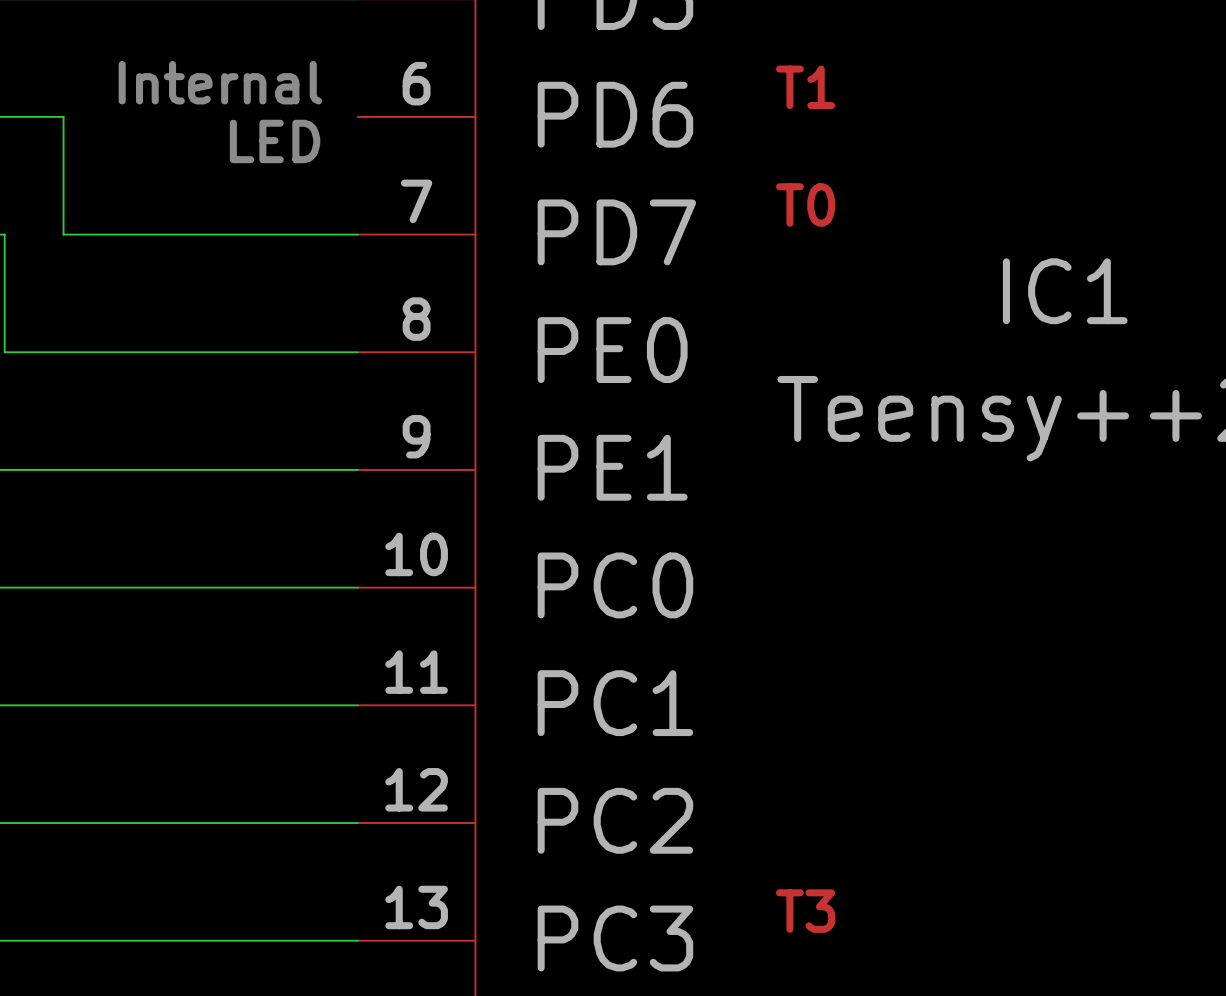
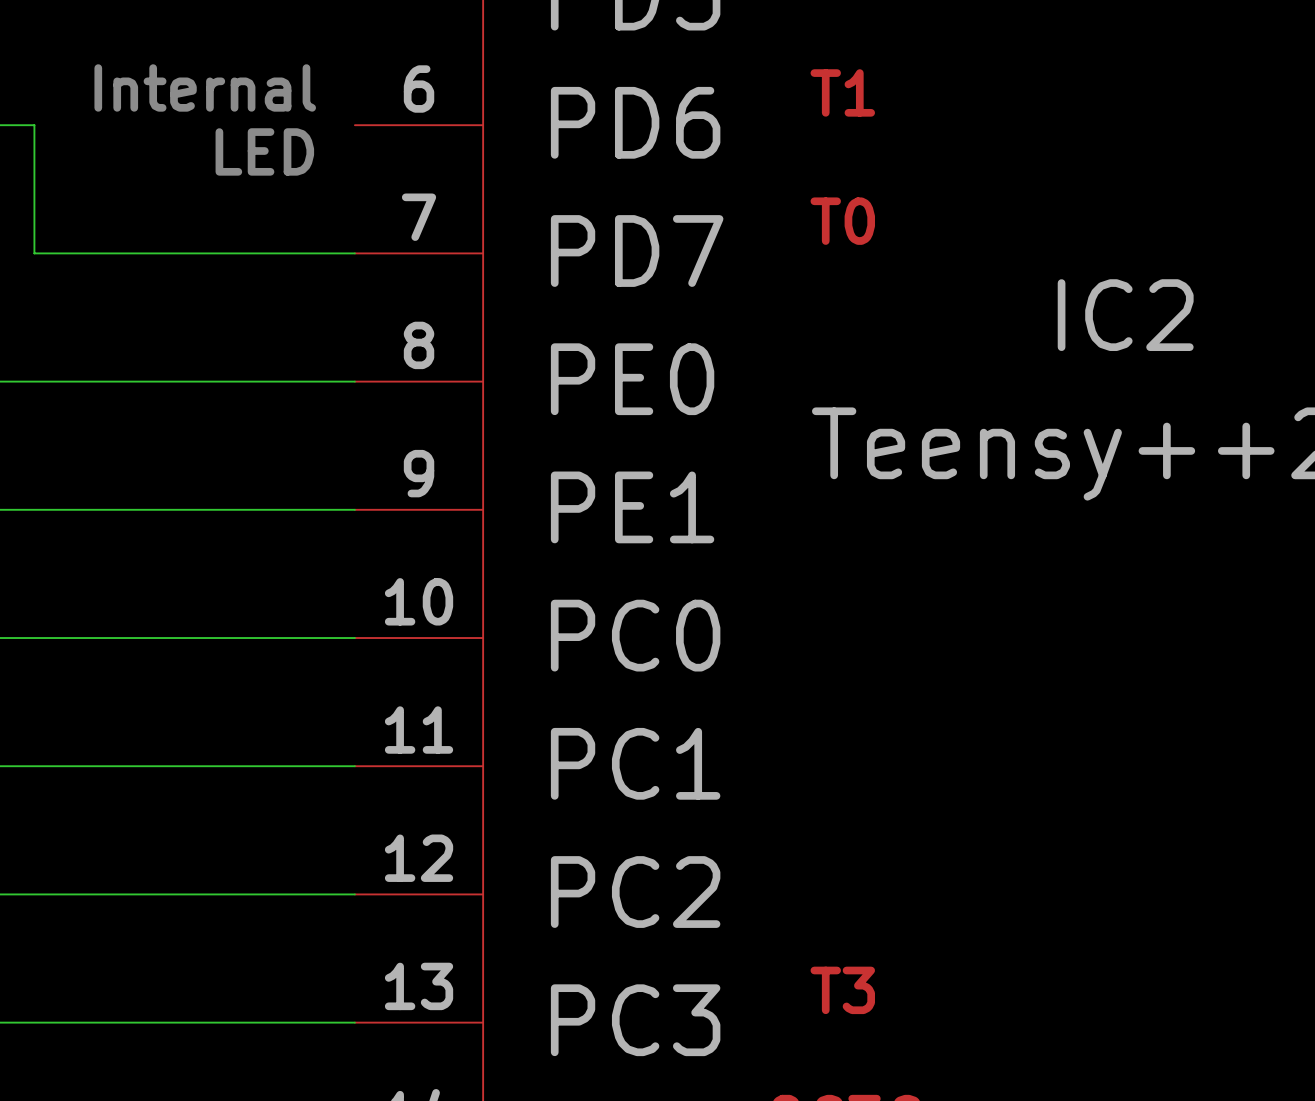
IC1 name: IC1 (1065, 291) -> IC2 (1125, 315)

